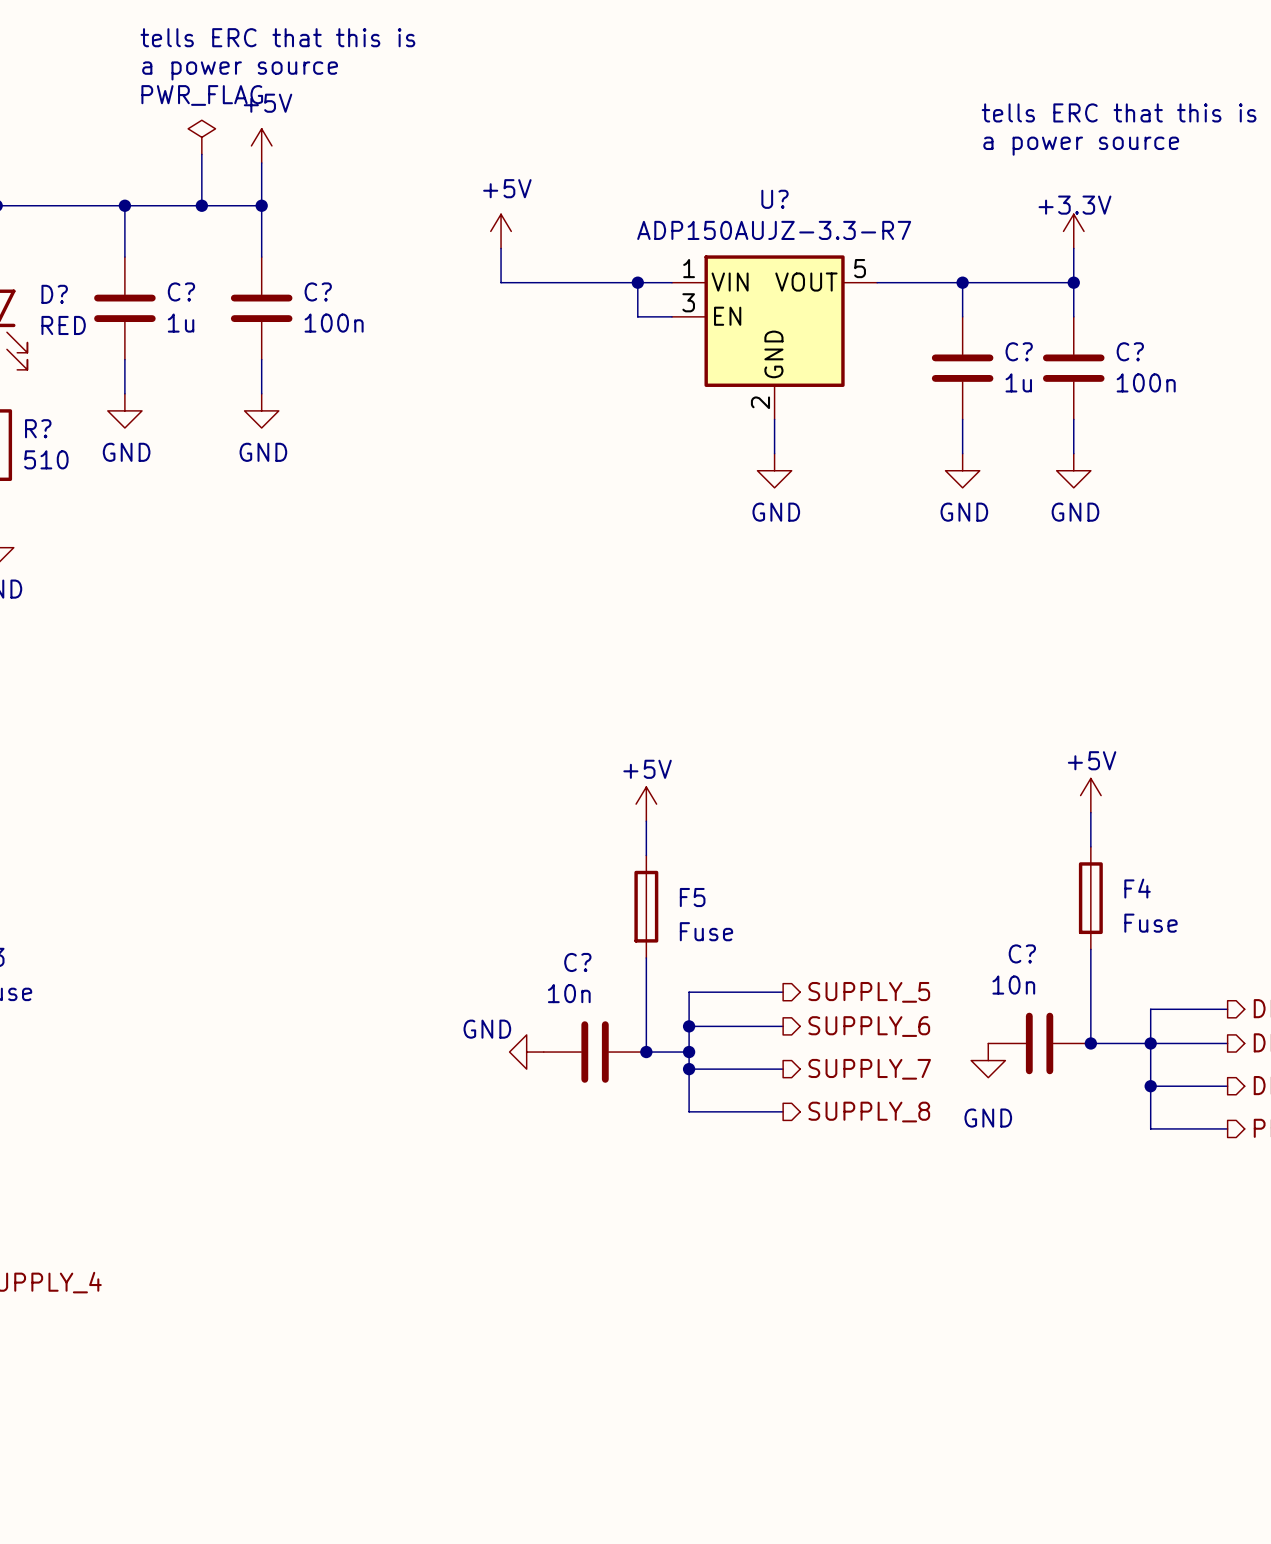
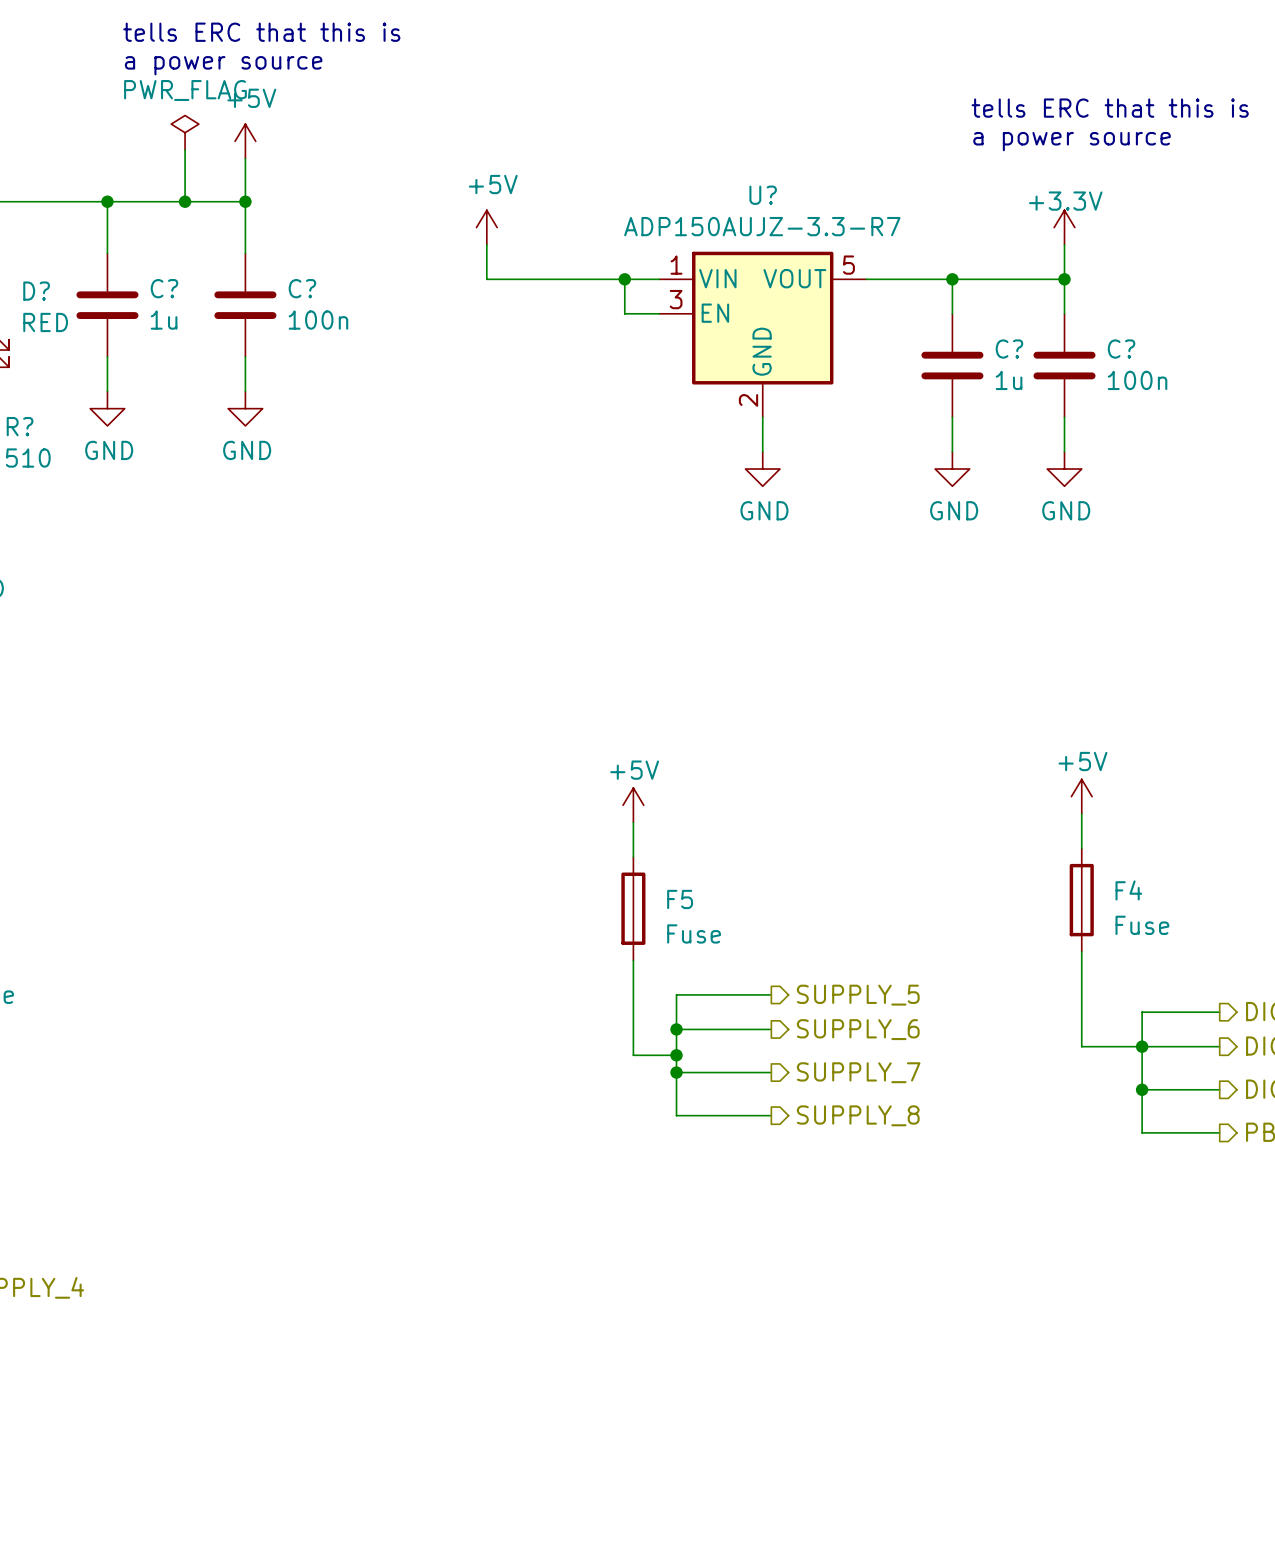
C?: 10n (1039, 1043) -> none
junction: (1090, 1043) -> none
power symbol: GND (526, 1052) -> none
C?: 10n (595, 1052) -> none
junction: (646, 1052) -> none
power symbol: GND (988, 1060) -> none

